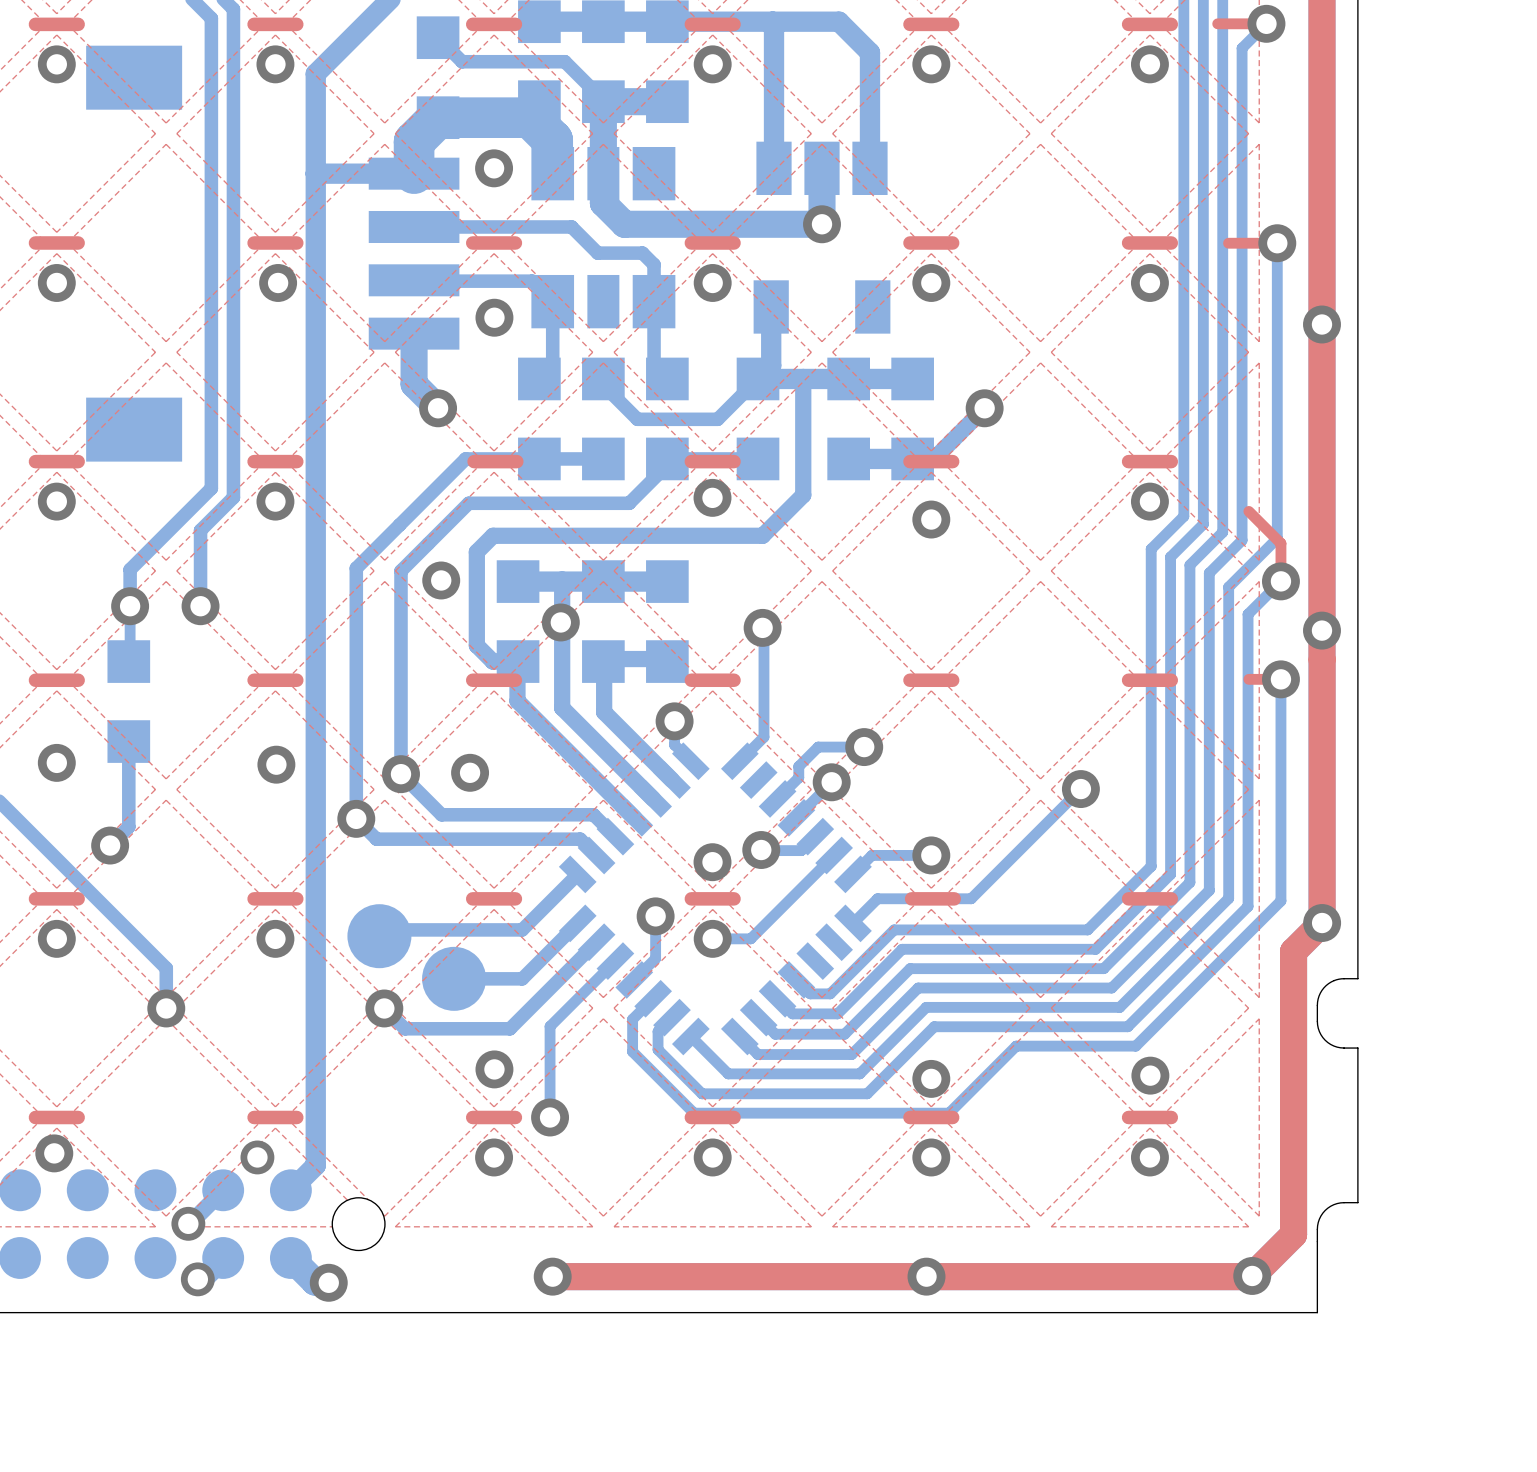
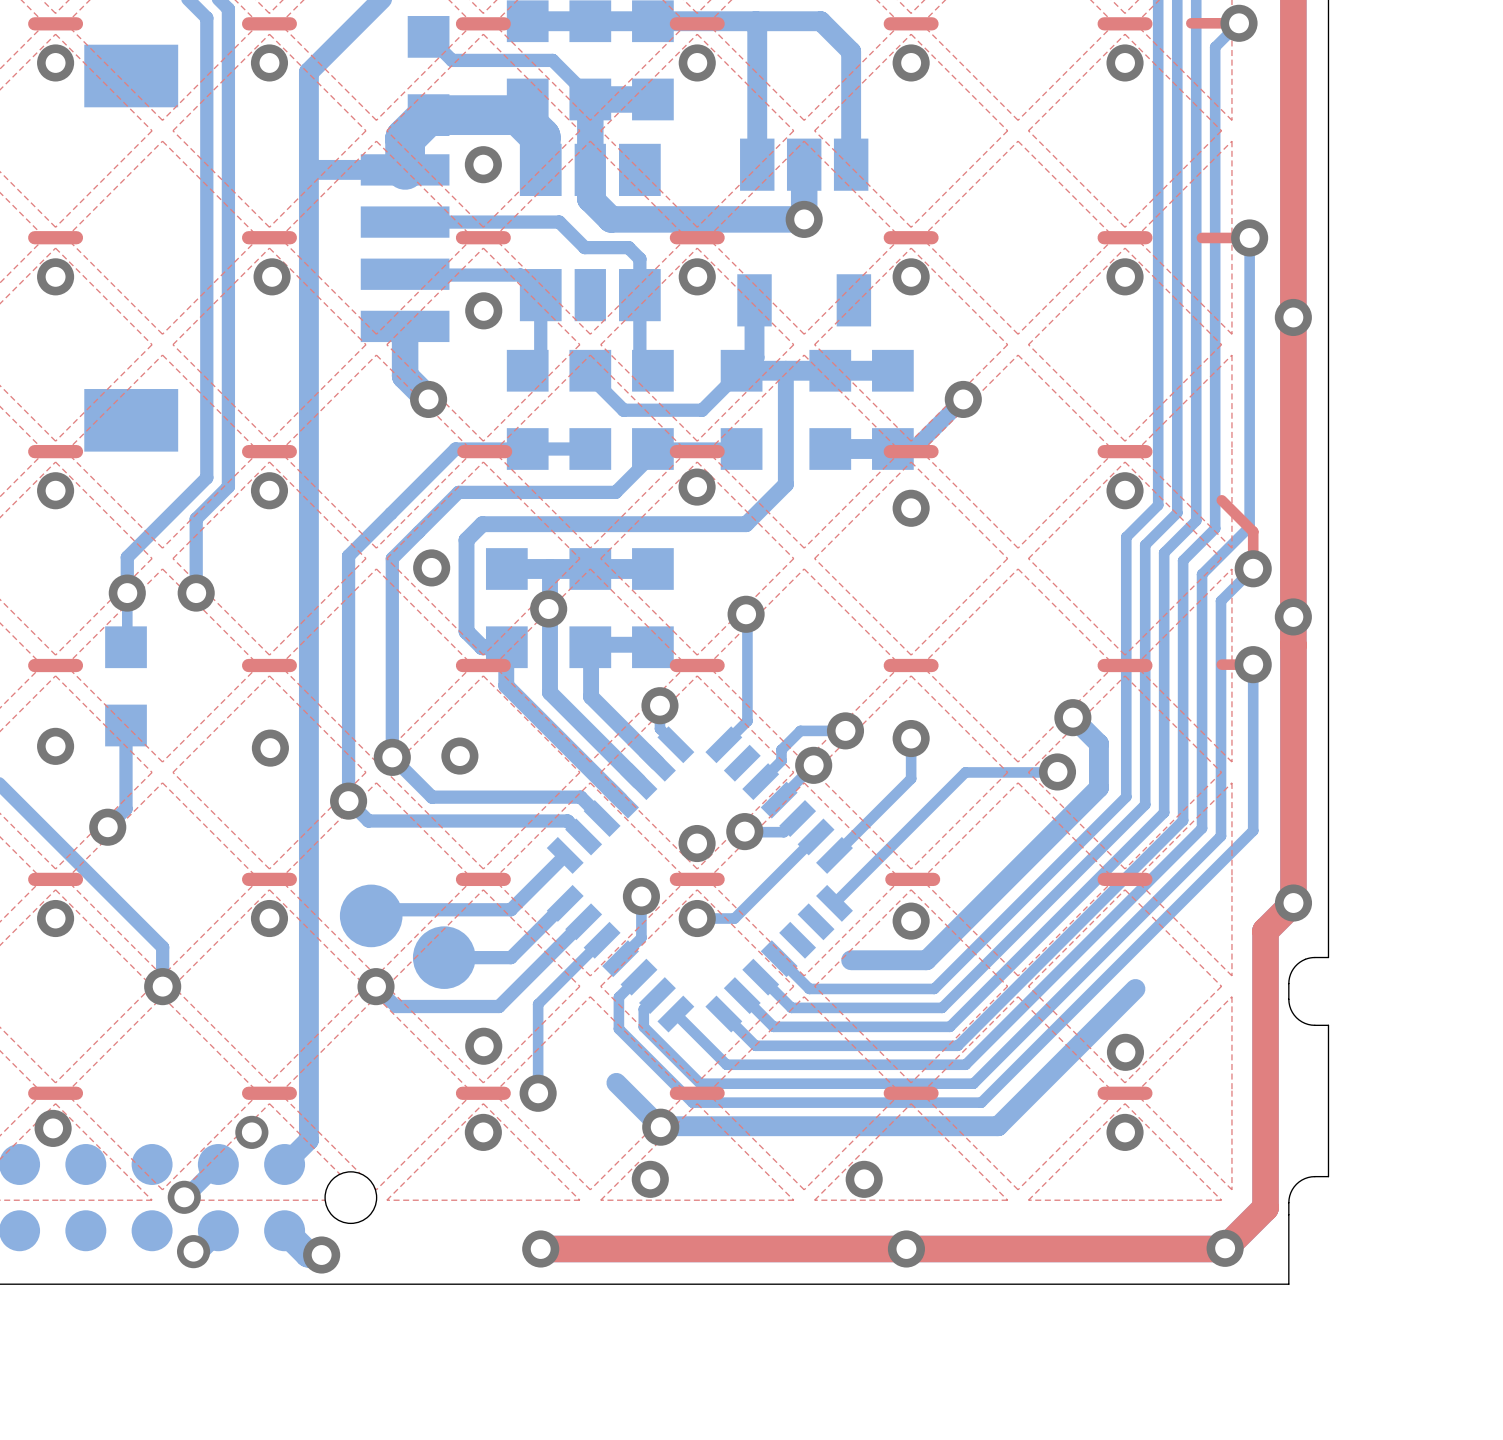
bottom track: none -> (1072, 717) (1098, 743) (1098, 787) (926, 960) (851, 960)
via: none -> (1072, 717)
via: none -> (911, 738)
bottom track: (1079, 790) (971, 898) (877, 898) -> (1056, 773) (965, 772) (858, 879)
bottom track: (1151, 814) (1151, 866) (1087, 929) (894, 929) (830, 993) (810, 993) -> (1126, 796) (934, 988) (809, 988) (792, 972)
bottom track: (1170, 822) (1170, 874) (1095, 949) (902, 949) (837, 1013) (792, 1013) -> (1145, 804) (942, 1007) (791, 1007) (775, 991)
bottom track: (1189, 830) (1189, 882) (1103, 968) (910, 968) (844, 1034) (775, 1034) -> (1164, 812) (949, 1026) (773, 1026) (758, 1011)
bottom track: (1209, 838) (1209, 890) (1111, 988) (918, 988) (851, 1054) (757, 1054) -> (1183, 820) (957, 1045) (755, 1045) (741, 1031)
bottom track: (1228, 846) (1228, 898) (1119, 1007) (926, 1007) (859, 1073) (728, 1073) -> (1202, 828) (965, 1064) (726, 1064) (712, 1050)
bottom track: (1280, 849) (1280, 900) (1135, 1046) (1016, 1046) (949, 1113) (694, 1113) -> (1253, 830) (981, 1102) (692, 1102) (678, 1089)
bottom track: (1248, 854) (1248, 906) (1127, 1026) (934, 1026) (867, 1093) (702, 1093) -> (1221, 836) (973, 1083) (700, 1083) (686, 1070)
bottom track: (871, 855) (931, 855) -> (853, 836) (911, 778) (911, 738)
via: (931, 855) -> none
via: none -> (911, 921)
bottom track: none -> (1135, 988) (998, 1126) (659, 1126) (616, 1082)
via: (931, 1078) -> none
via position: (712, 1157) -> (660, 1127)
via: (931, 1157) -> none
via: none -> (650, 1179)
via: none -> (864, 1179)

